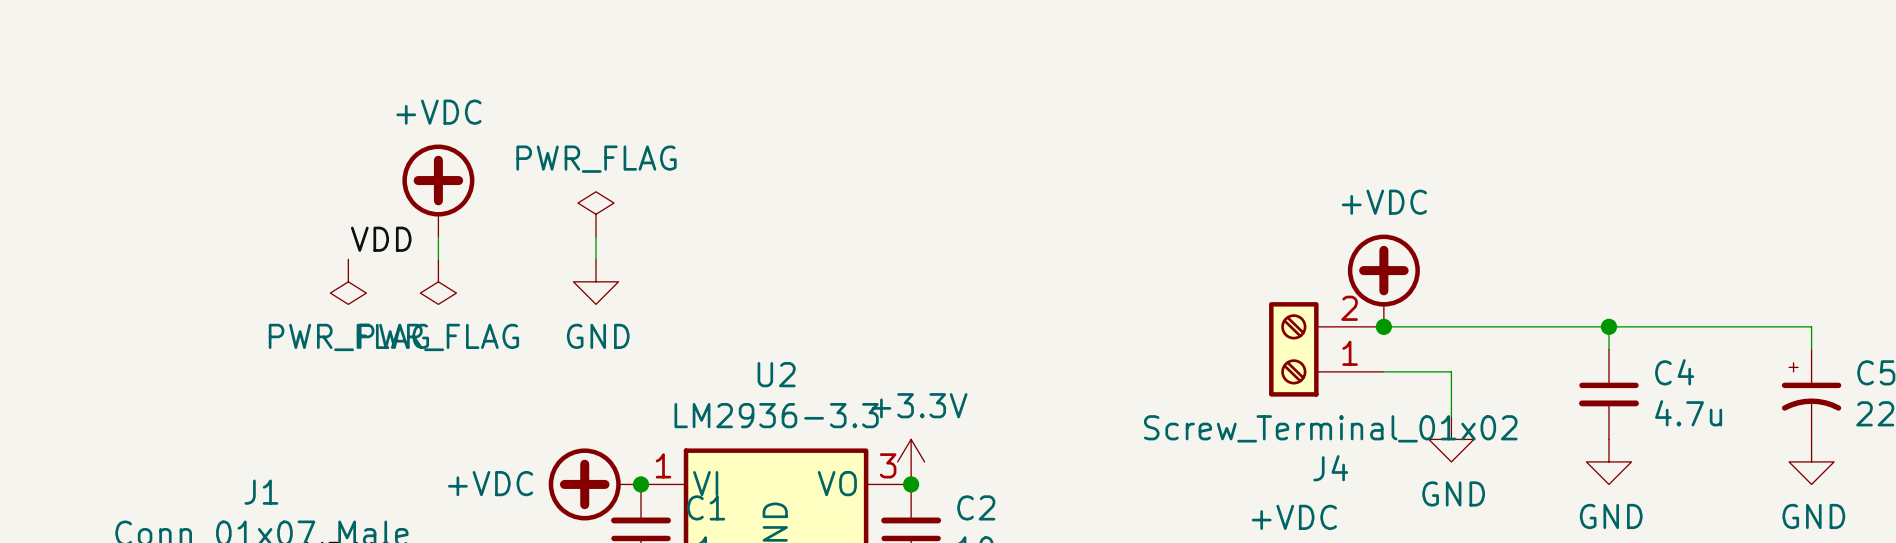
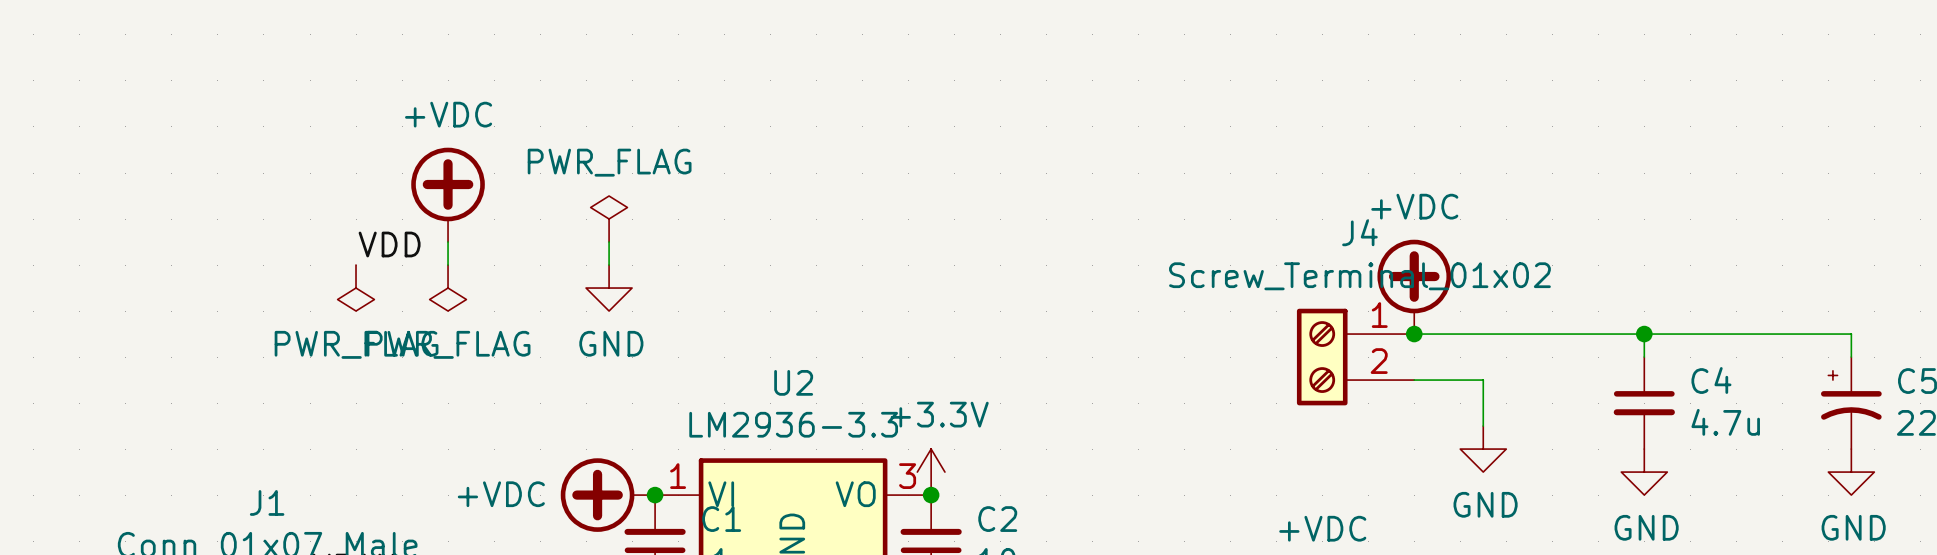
J4 flip: as is (1293, 349) -> up-down (1322, 357)

